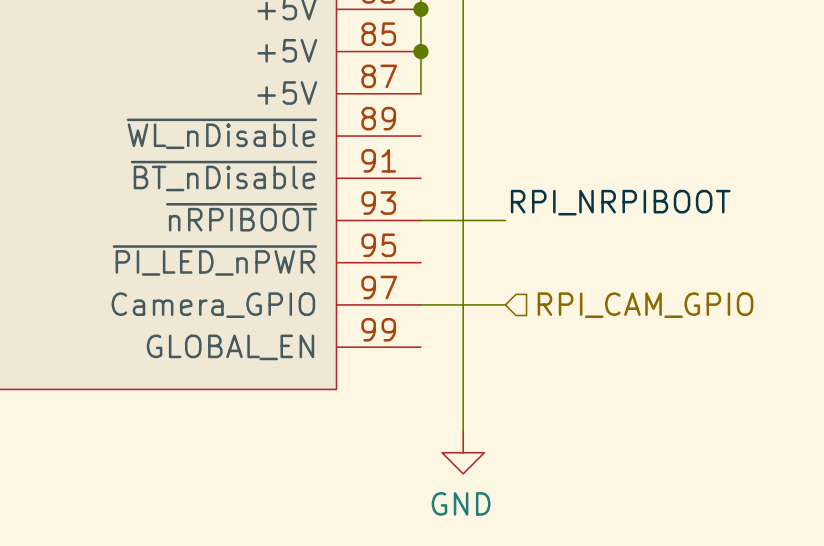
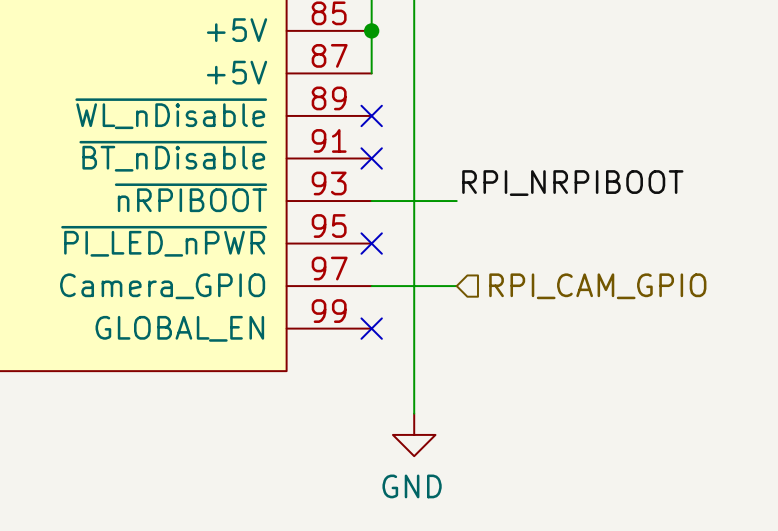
no-connect mark: none -> (371, 115)
no-connect mark: none -> (371, 158)
no-connect mark: none -> (371, 243)
no-connect mark: none -> (371, 328)

